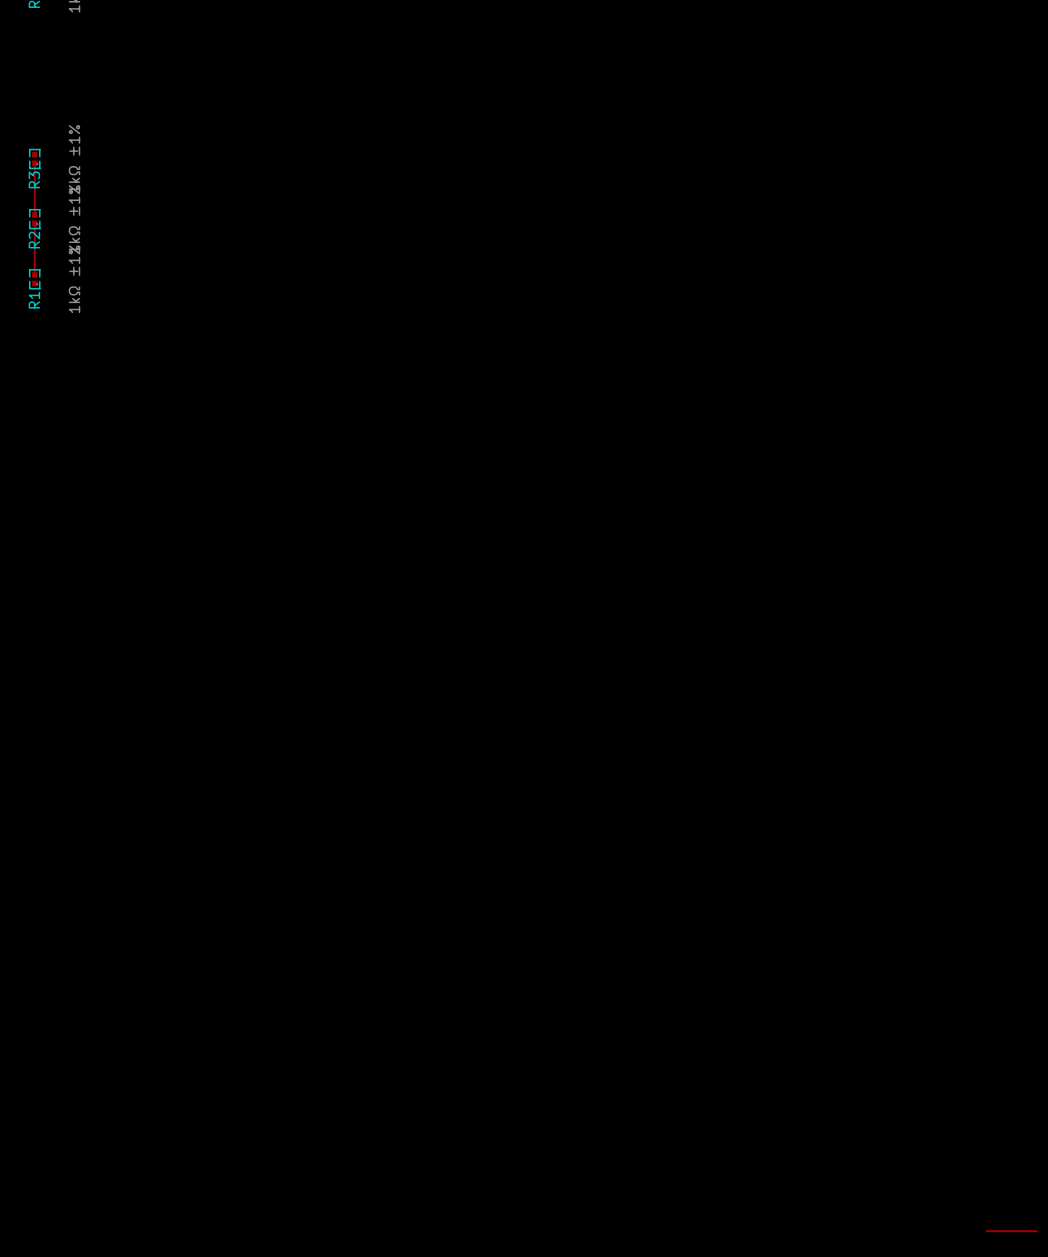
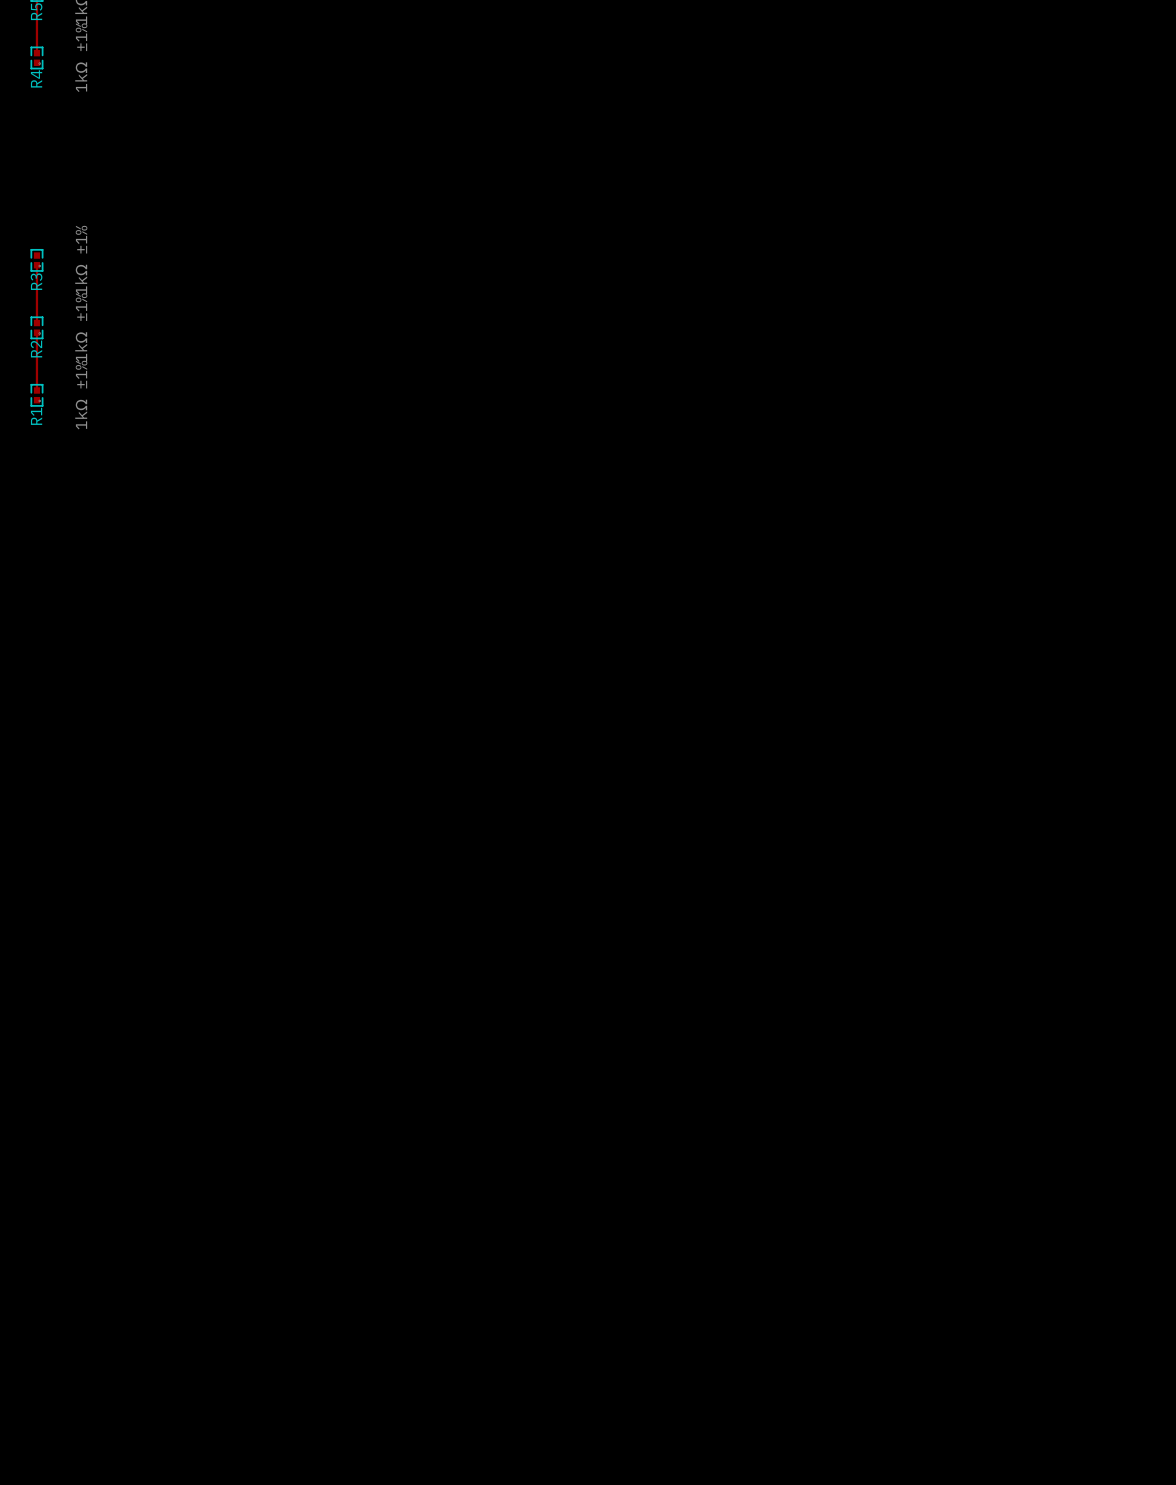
track: (986, 1231) (1036, 1231) -> none

